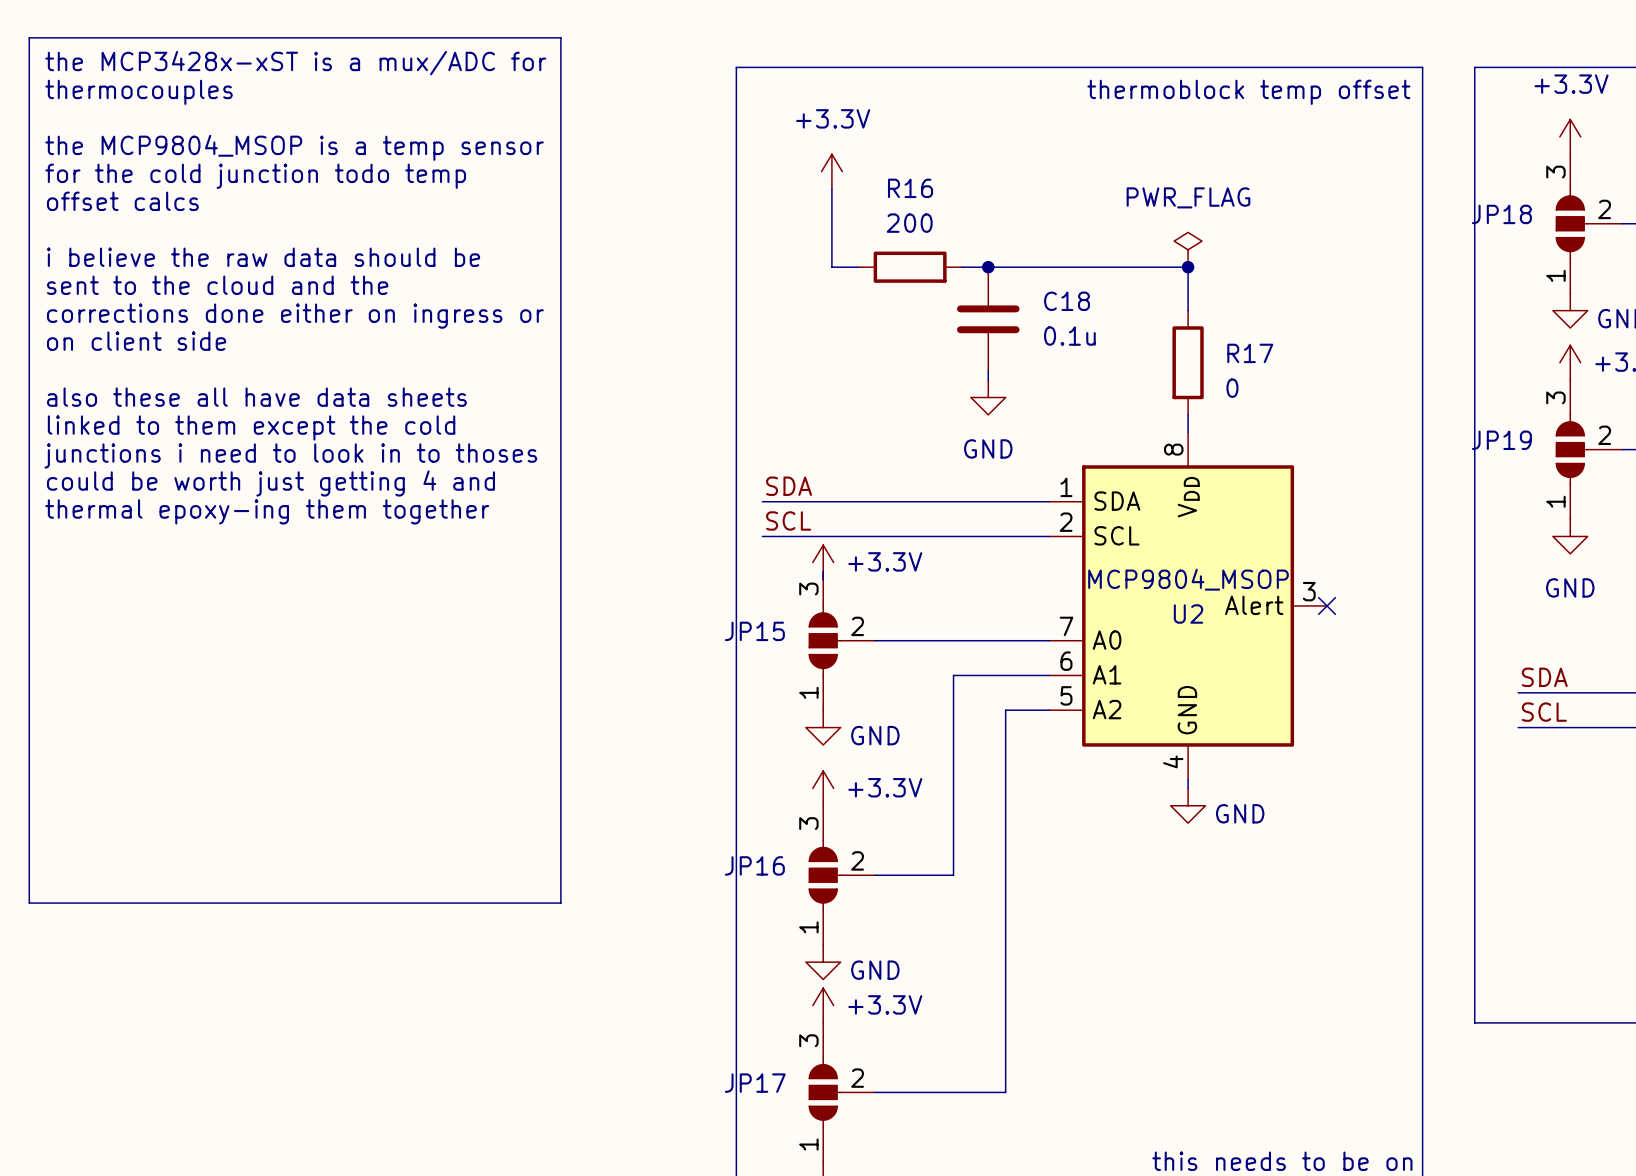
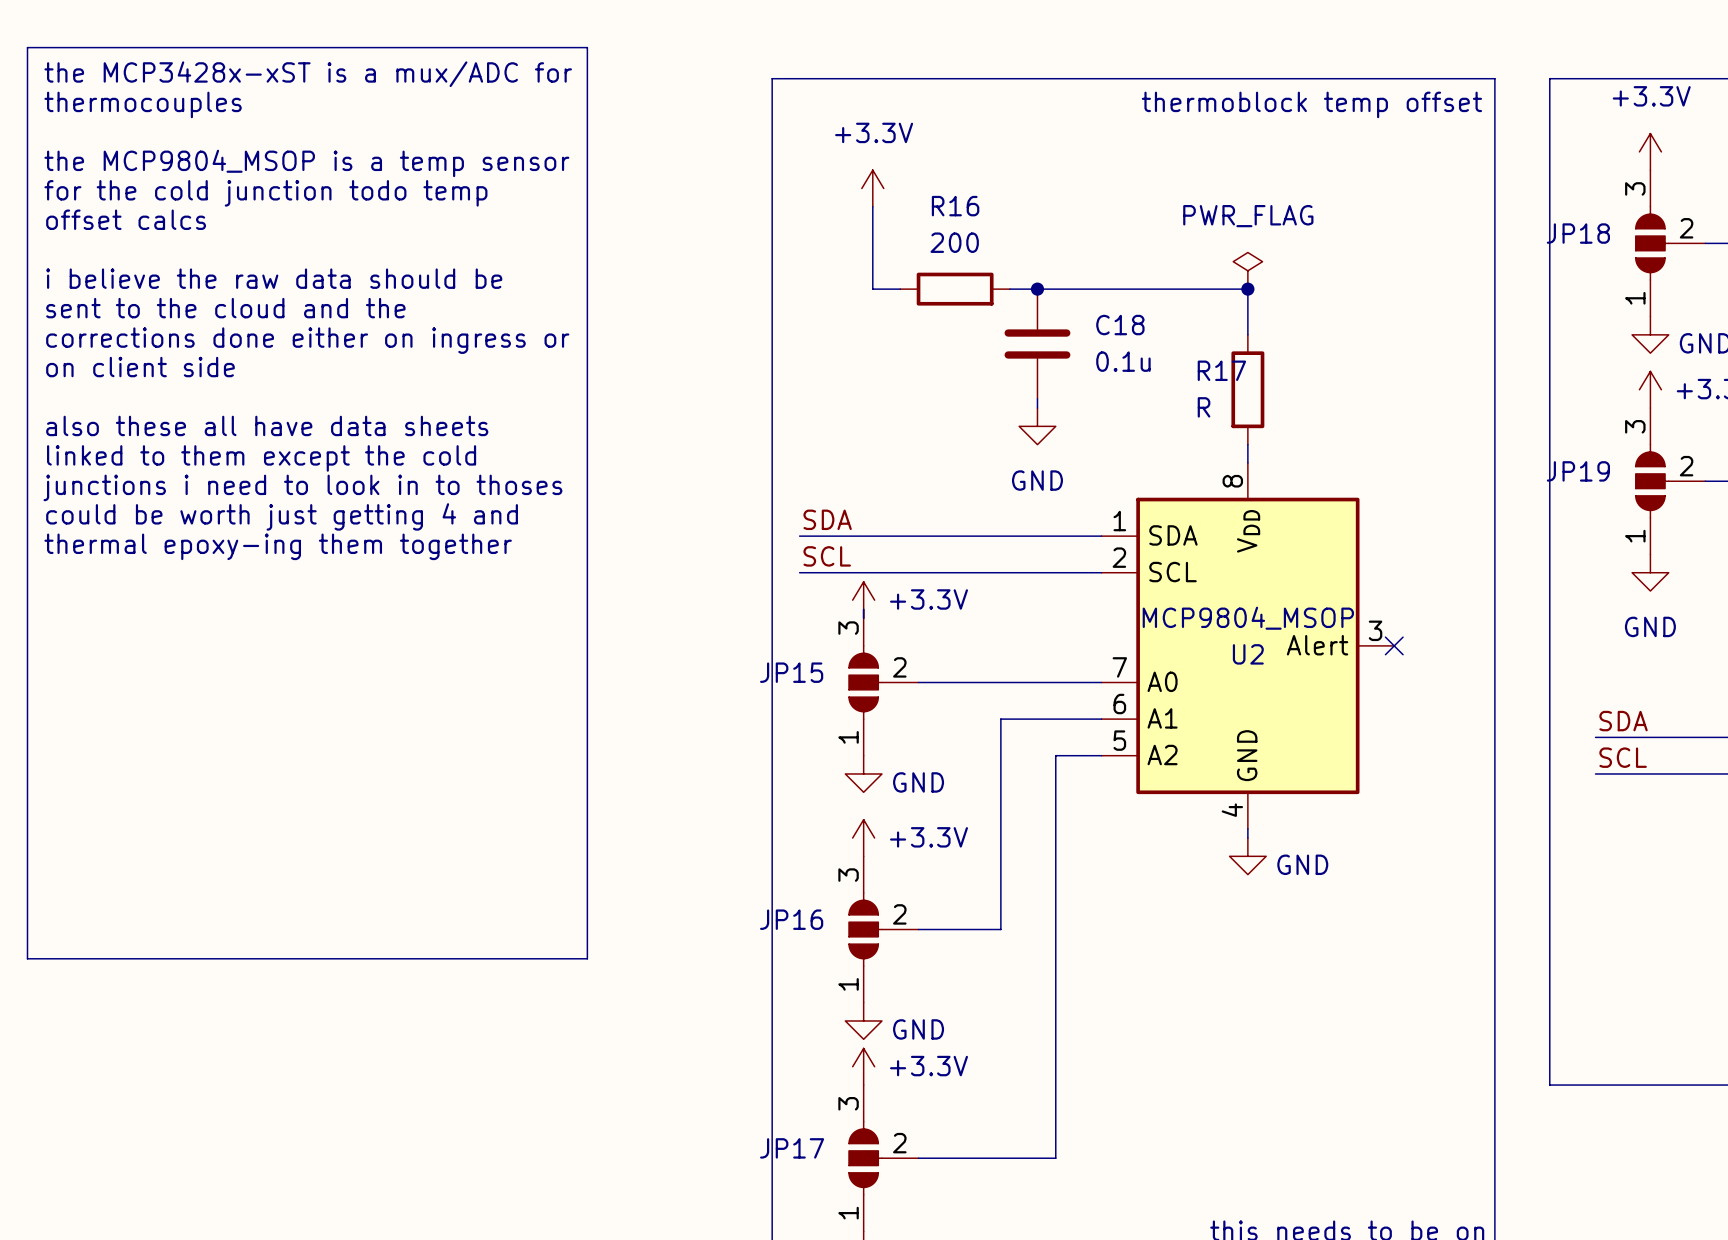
R17 name position: R17 (1250, 353) -> R17 (1221, 370)
R17 value: 0 (1232, 388) -> R (1204, 407)

